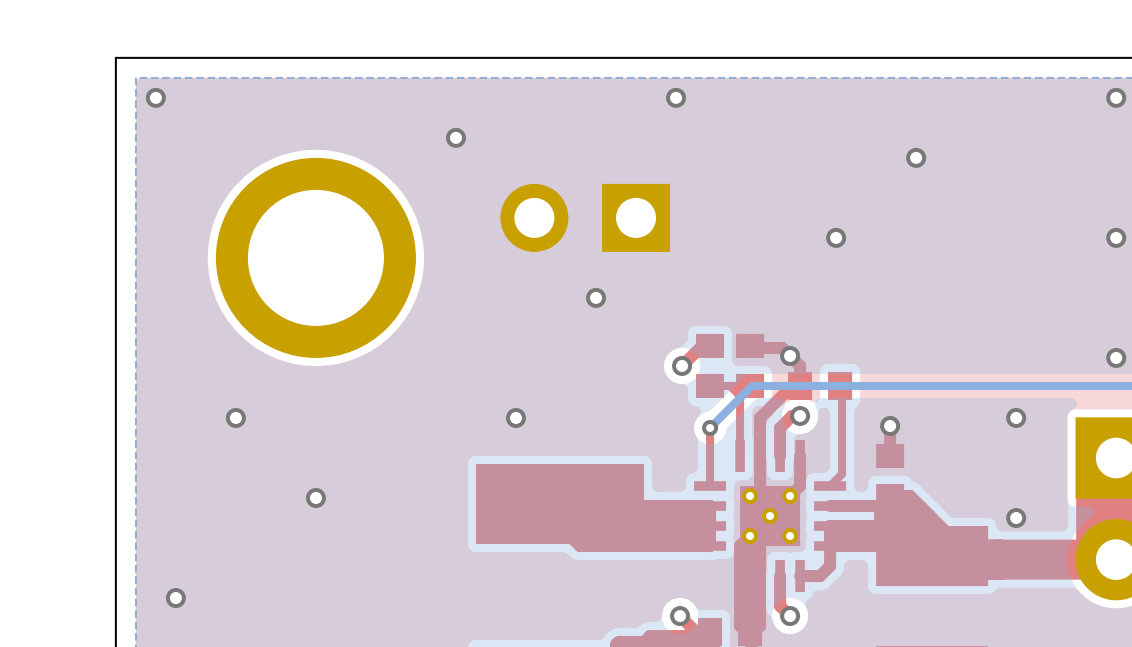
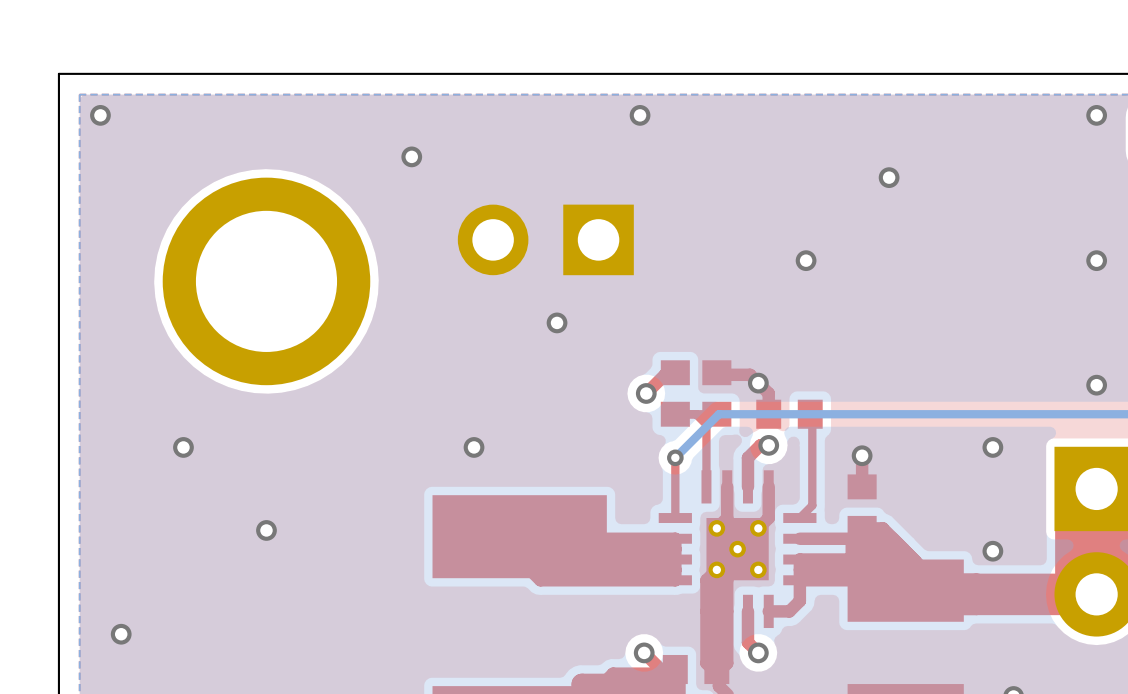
top track: (800, 385) (792, 385) (760, 417) (760, 455) -> none

